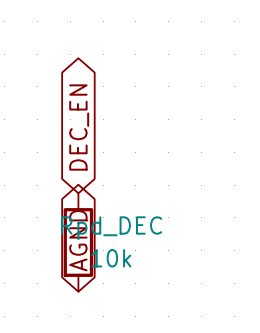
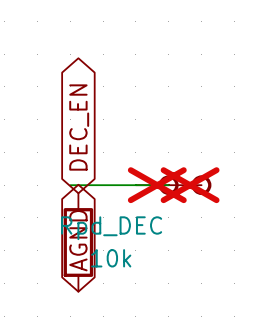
wire: none -> (70, 185) (168, 185)
part: none -> (157, 185)
part: none -> (190, 185)

